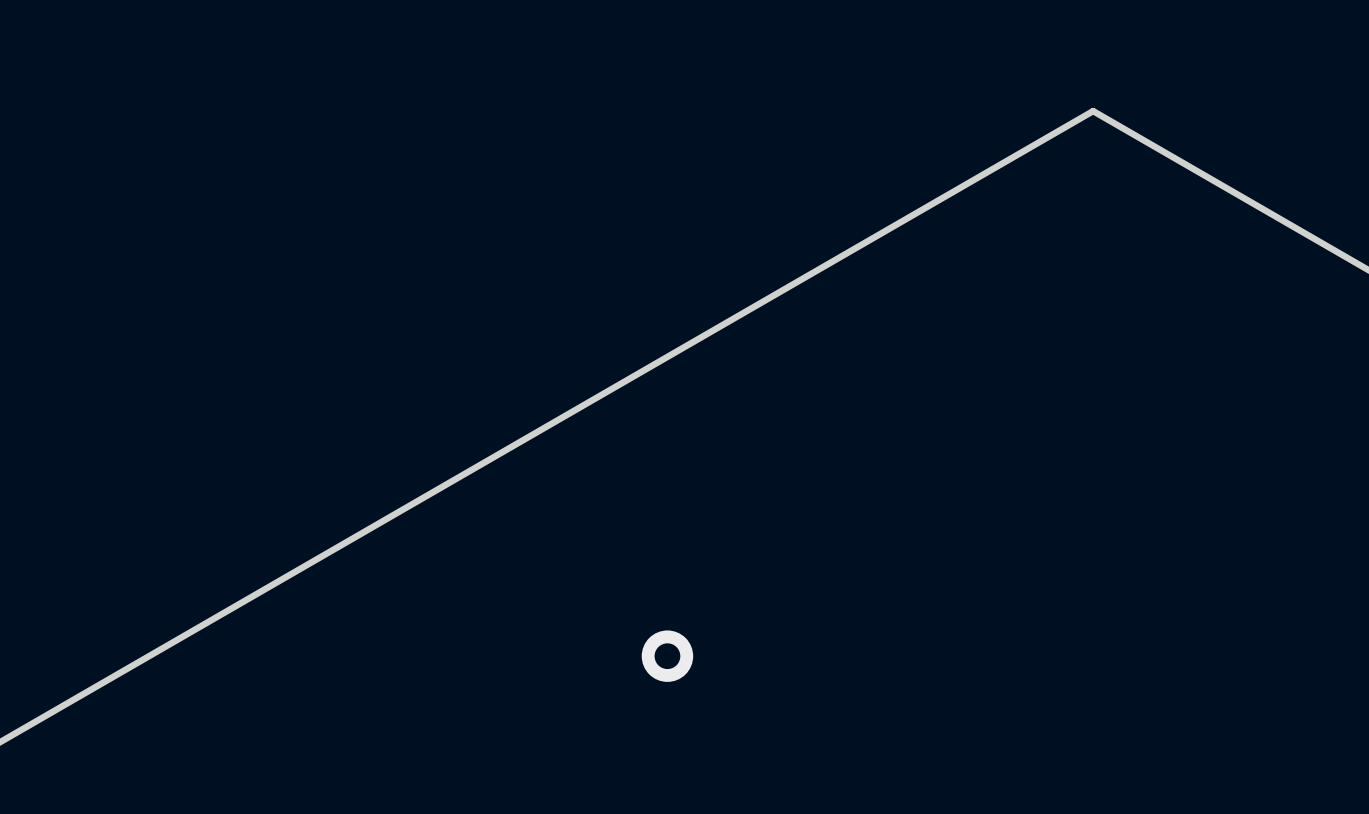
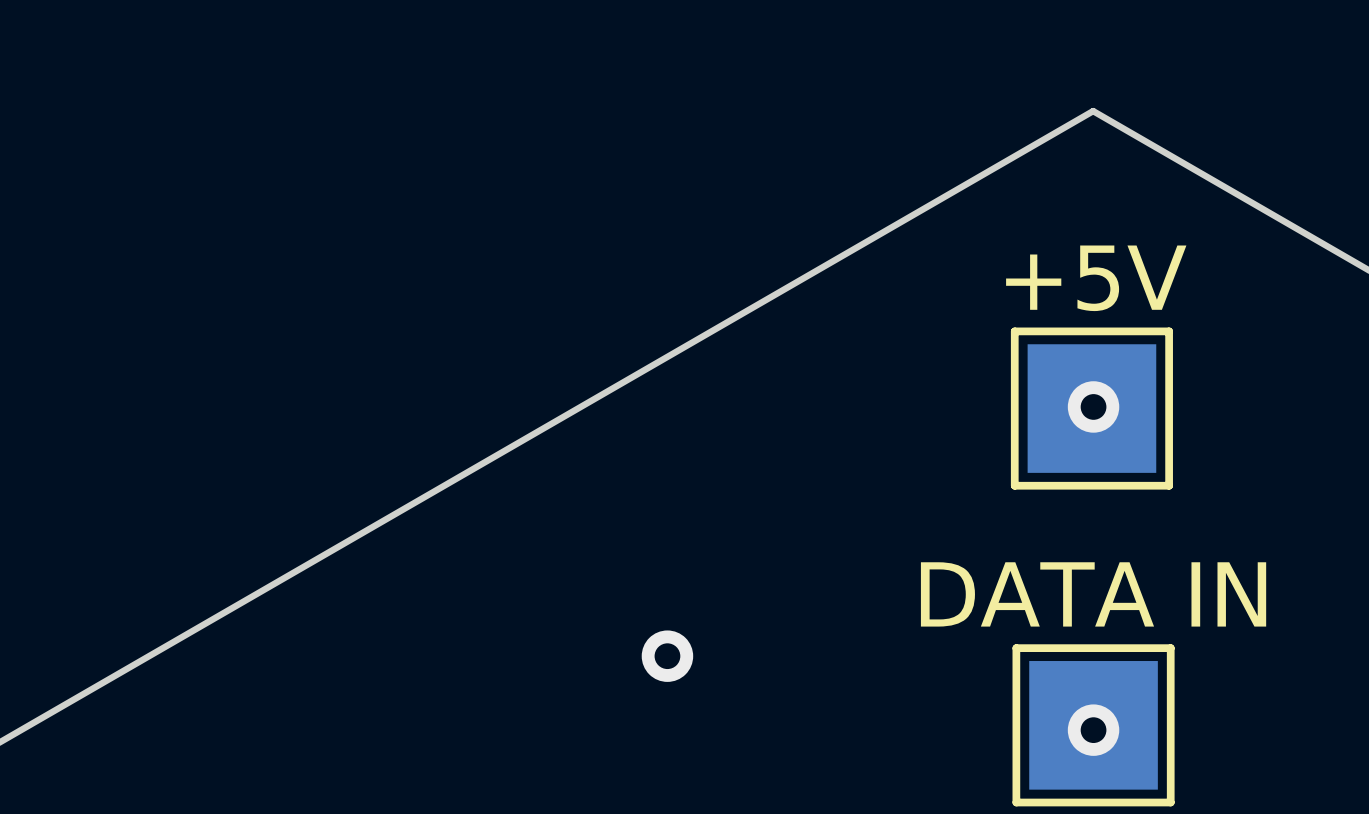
via: none -> (1093, 406)
+5V: none -> (1091, 408)
DATA IN: none -> (1093, 725)
via: none -> (1093, 730)

